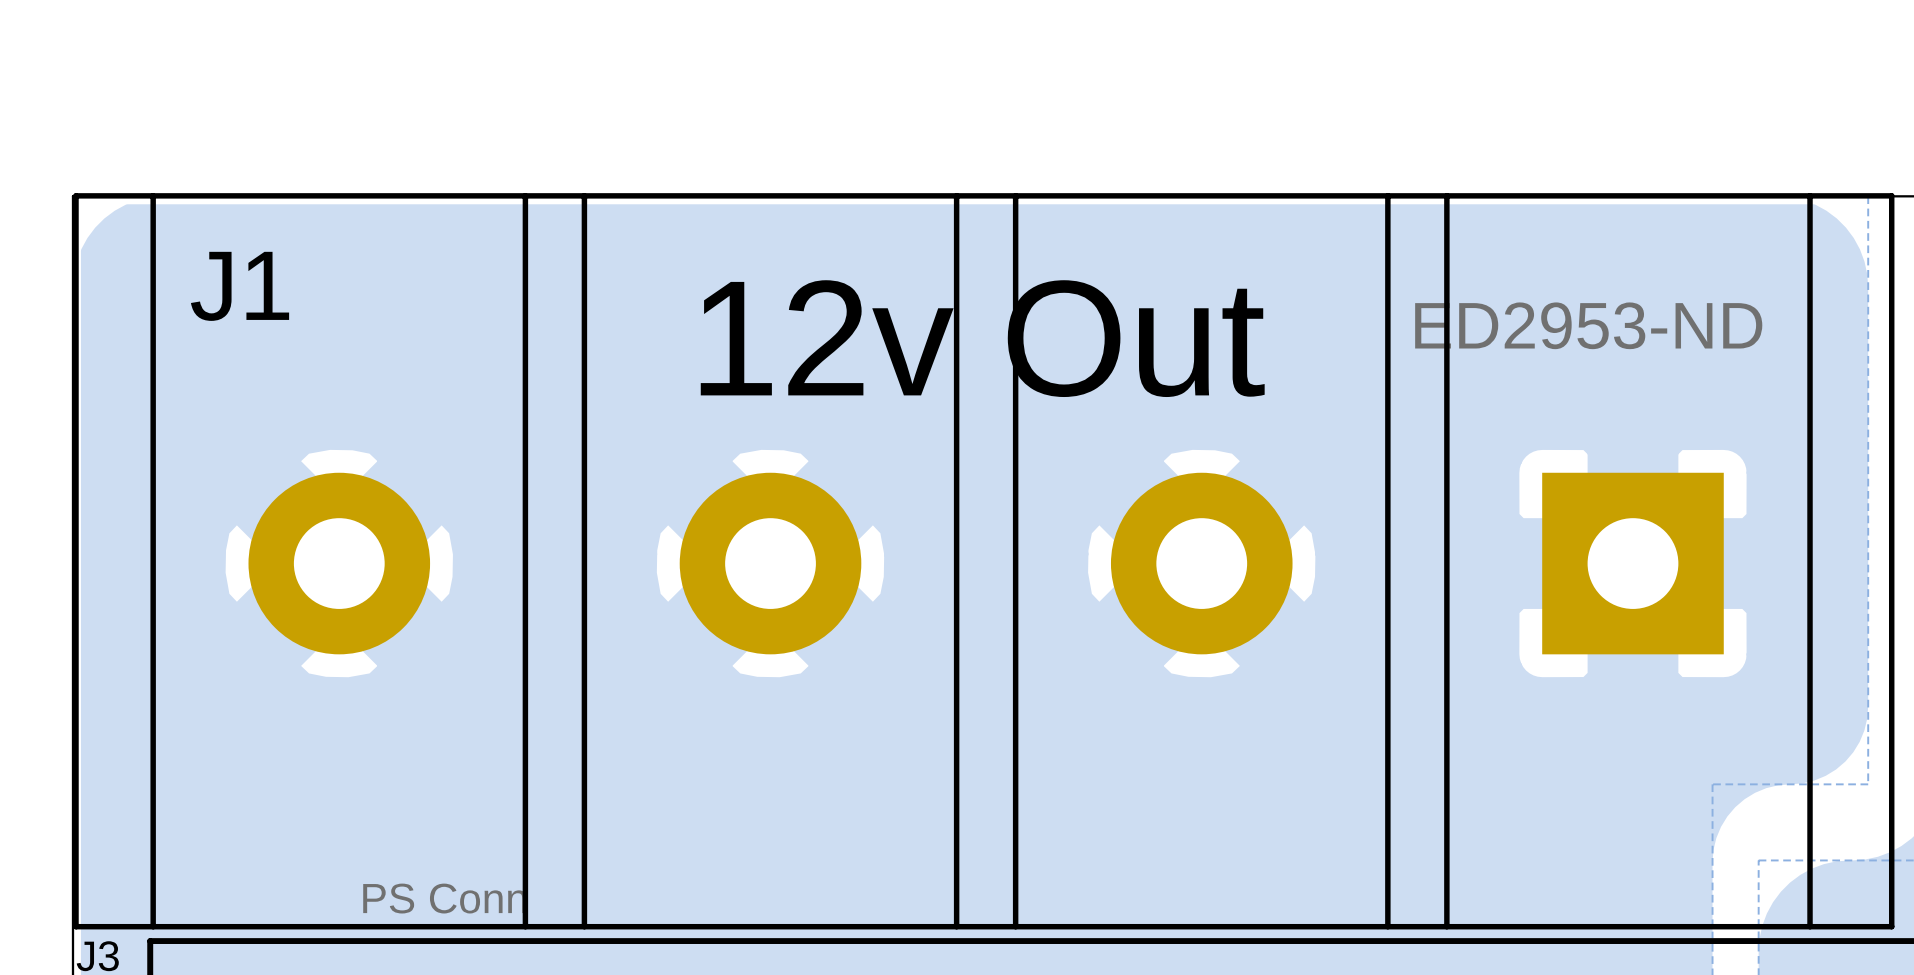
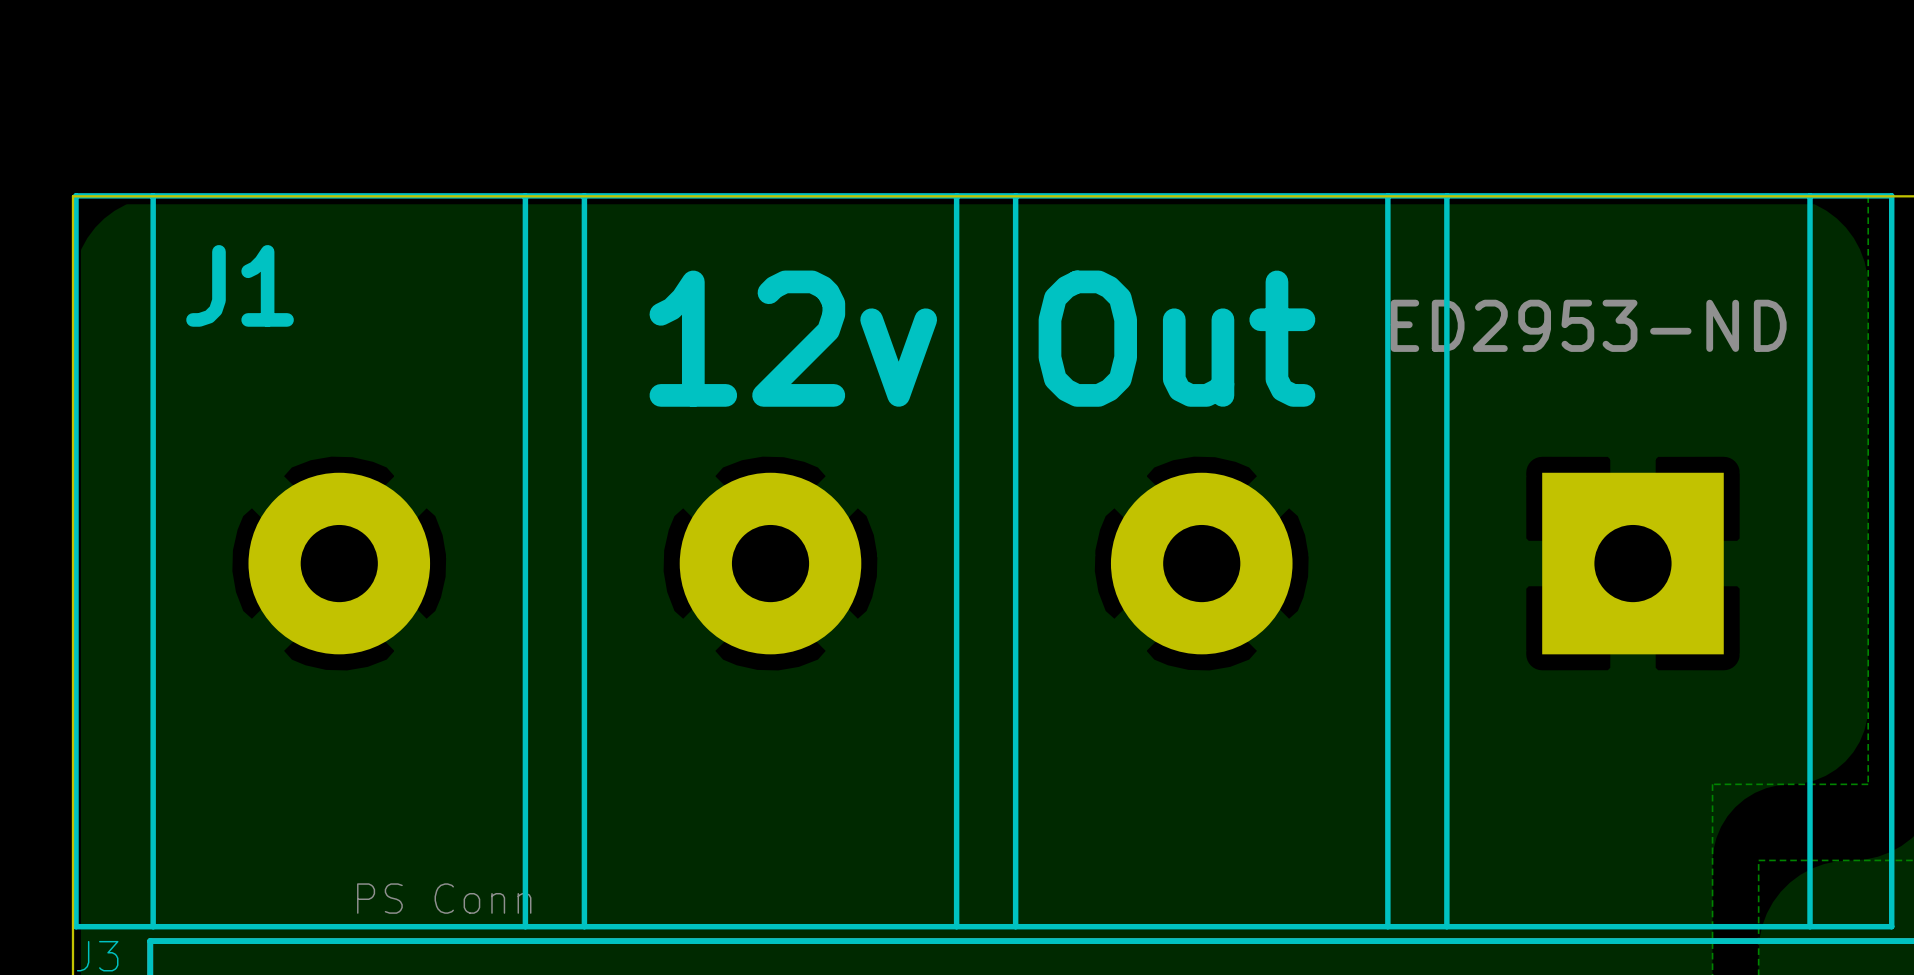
J1 footprint: [73, 193, 1895, 930] -> [73, 193, 1895, 930]

